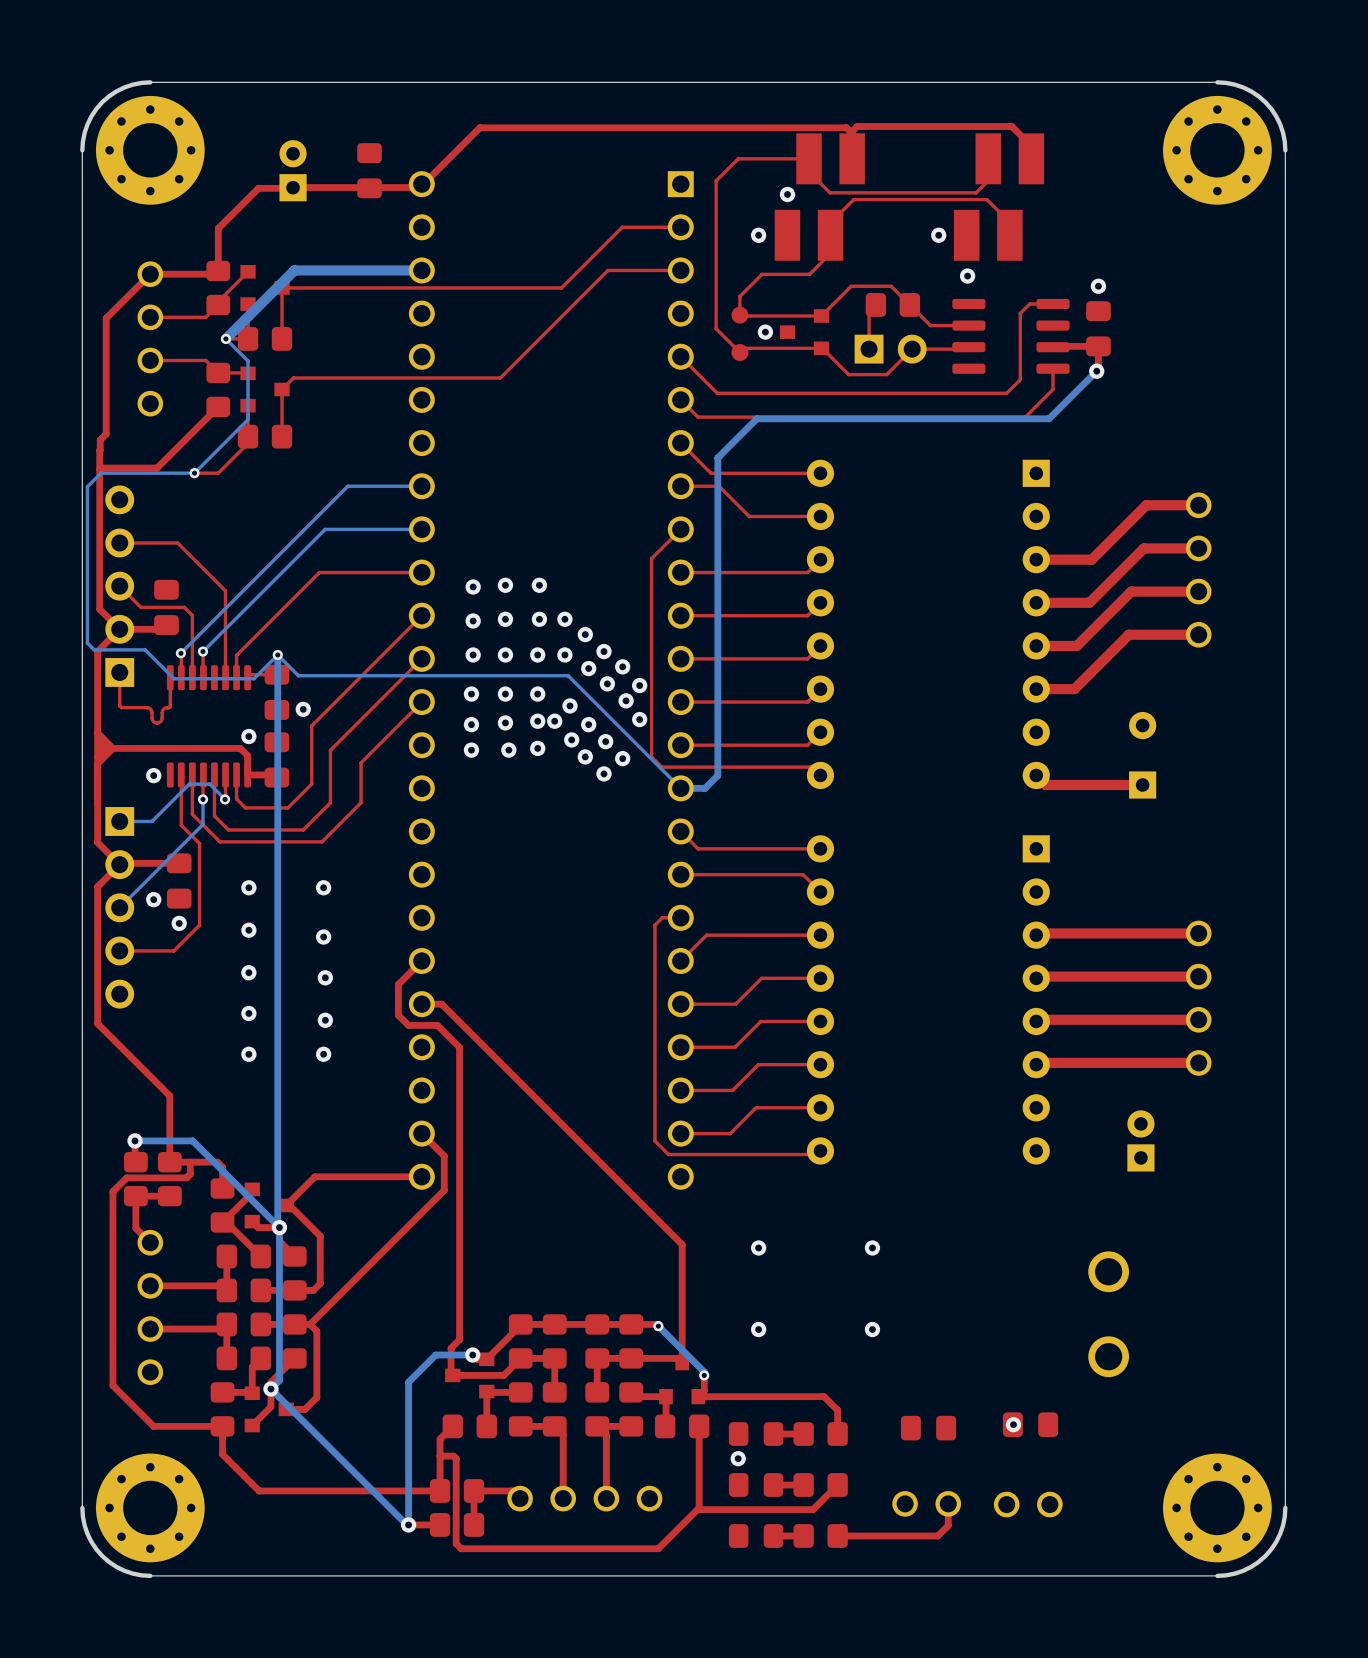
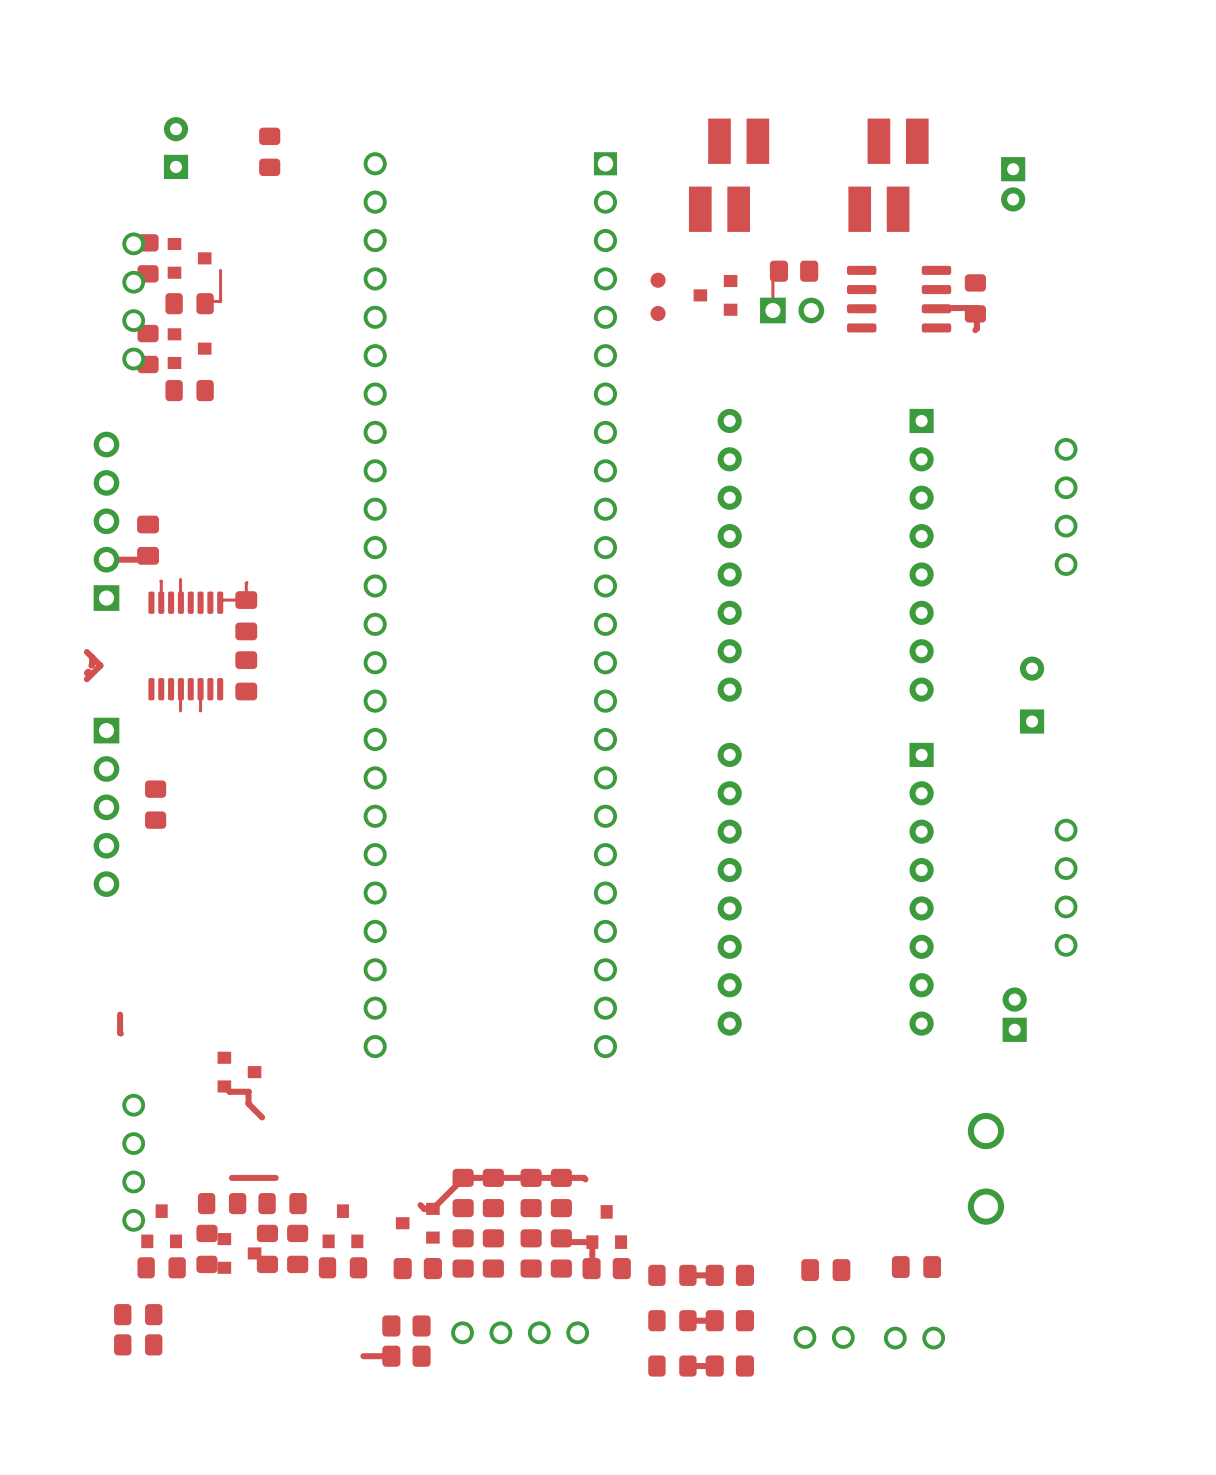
board edge: (1217, 82) (150, 82) (124, 87) (108, 96) (96, 108) (87, 124) (82, 150) (82, 1507) (87, 1533) (96, 1549) (108, 1561) (132, 1573) (150, 1575) (1217, 1575) (1243, 1570) (1258, 1561) (1271, 1549) (1283, 1525) (1285, 1507) (1285, 150) (1280, 124) (1265, 102) (1243, 87) (1217, 82) -> none
top track: (852, 133) (846, 127) (479, 127) (420, 187) (258, 188) (218, 228) (218, 270) (215, 274) (150, 274) (106, 318) (106, 434) (100, 440) (99, 450) (99, 609) (119, 629) (97, 651) (97, 842) (119, 864) -> none
part footprint: [279, 140, 307, 202] -> [259, 127, 281, 177]
part: (150, 150) -> none
part: (1217, 150) -> none
top track: (988, 158) (988, 180) (976, 192) (829, 192) (809, 171) (809, 158) (738, 158) (716, 180) (716, 328) (739, 352) (744, 348) (822, 348) (848, 374) (886, 374) (912, 349) (966, 349) (968, 347) -> none
top track: (1031, 158) (1031, 146) (1011, 126) (857, 126) (852, 131) (852, 158) -> none
part: none -> (176, 148)
part: (369, 170) -> none
via: (787, 194) -> none
part: none -> (1013, 184)
top track: (680, 227) (622, 227) (561, 287) (282, 287) (282, 338) -> none
via: (758, 235) -> none
via: (938, 235) -> none
top track: (1009, 235) (1009, 222) (986, 199) (853, 199) (830, 222) (830, 253) (809, 274) (762, 274) (739, 296) (740, 315) (821, 315) (851, 286) (891, 286) (930, 325) (968, 325) -> none
part footprint: [206, 260, 231, 316] -> [167, 237, 212, 279]
bottom track: (421, 270) (294, 270) (225, 338) (248, 361) (248, 419) (194, 473) (101, 473) (87, 486) (87, 643) (94, 649) (145, 649) (174, 678) (253, 678) (277, 654) -> none
top track: (680, 270) (607, 270) (500, 378) (293, 378) (282, 389) (282, 436) -> none
top track: (248, 271) (218, 301) (218, 304) (205, 317) (150, 317) -> none
via: (967, 276) -> none
via: (1098, 286) -> none
part: (265, 287) -> none
part: none -> (148, 258)
part footprint: [1086, 301, 1111, 357] -> [964, 274, 986, 323]
top track: (1053, 304) (1029, 304) (1020, 313) (1020, 379) (1006, 393) (717, 393) (680, 356) -> none
via: (765, 332) -> none
via: (225, 338) -> none
part: (265, 338) -> none
part: none -> (189, 303)
top track: (150, 360) (205, 360) (218, 372) (248, 373) -> none
part footprint: [206, 362, 231, 418] -> [167, 328, 212, 370]
top track: (1053, 368) (1053, 389) (1025, 417) (697, 417) (680, 399) -> none
bottom track: (1096, 371) (1049, 418) (756, 418) (717, 457) (717, 775) (705, 788) (680, 788) (568, 675) (298, 675) (277, 654) -> none
via: (1096, 371) -> none
part: (265, 389) -> none
part: none -> (148, 349)
top track: (248, 405) (248, 443) (218, 473) (194, 473) (196, 471) -> none
top track: (218, 406) (157, 468) (99, 469) -> none
part: (265, 436) -> none
part: none -> (189, 390)
top track: (680, 443) (711, 473) (820, 473) -> none
via: (194, 473) -> none
bottom track: (421, 486) (347, 486) (180, 653) -> none
top track: (680, 486) (719, 486) (749, 516) (820, 516) -> none
top track: (1198, 505) (1146, 505) (1091, 559) (1036, 559) -> none
bottom track: (421, 529) (325, 529) (202, 651) -> none
top track: (680, 529) (651, 558) (651, 756) (661, 767) (812, 767) (820, 775) -> none
top track: (119, 542) (177, 542) (225, 590) (225, 677) -> none
top track: (1198, 548) (1143, 548) (1089, 602) (1036, 602) -> none
top track: (820, 559) (807, 572) (680, 572) -> none
top track: (421, 572) (319, 572) (236, 655) (236, 677) -> none
via: (505, 585) -> none
via: (539, 585) -> none
top track: (119, 586) (140, 607) (184, 607) (192, 615) (192, 677) -> none
via: (473, 587) -> none
top track: (1198, 591) (1131, 591) (1076, 645) (1036, 645) -> none
top track: (820, 602) (807, 615) (680, 615) -> none
top track: (421, 615) (311, 725) (311, 784) (287, 807) (245, 807) (236, 798) (236, 774) -> none
via: (505, 619) -> none
via: (539, 619) -> none
via: (564, 619) -> none
via: (473, 620) -> none
via: (585, 634) -> none
top track: (1198, 634) (1128, 634) (1074, 689) (1036, 689) -> none
top track: (820, 645) (807, 658) (680, 658) -> none
via: (202, 651) -> none
via: (603, 651) -> none
via: (180, 653) -> none
bottom track: (277, 654) (277, 1225) -> none
via: (277, 654) -> none
via: (473, 654) -> none
via: (505, 654) -> none
via: (537, 654) -> none
via: (564, 654) -> none
top track: (421, 658) (330, 750) (330, 802) (303, 829) (228, 829) (214, 815) (214, 774) -> none
via: (622, 666) -> none
via: (588, 668) -> none
top track: (119, 672) (119, 705) (121, 707) (148, 708) (151, 711) (152, 720) (156, 722) (161, 720) (163, 709) (170, 706) (170, 677) -> none
via: (607, 683) -> none
via: (639, 685) -> none
top track: (820, 689) (807, 702) (680, 702) -> none
via: (471, 694) -> none
via: (505, 694) -> none
via: (537, 694) -> none
via: (626, 700) -> none
top track: (421, 702) (361, 762) (361, 802) (321, 841) (219, 841) (192, 814) (192, 774) -> none
via: (570, 705) -> none
via: (303, 709) -> none
via: (639, 719) -> none
via: (537, 721) -> none
via: (554, 721) -> none
via: (505, 722) -> none
via: (471, 724) -> none
via: (588, 724) -> none
top track: (820, 732) (807, 745) (680, 745) -> none
via: (248, 736) -> none
via: (571, 739) -> none
via: (605, 741) -> none
top track: (99, 745) (102, 748) (240, 748) (247, 755) (247, 774) (274, 774) (276, 777) -> none
via: (537, 748) -> none
via: (471, 750) -> none
via: (508, 750) -> none
part position: (1142, 755) -> (1032, 695)
via: (585, 756) -> none
via: (622, 758) -> none
via: (603, 773) -> none
top track: (181, 774) (181, 825) (199, 843) (199, 925) (173, 950) (119, 950) -> none
via: (153, 775) -> none
top track: (1036, 775) (1045, 785) (1142, 785) -> none
bottom track: (202, 799) (202, 824) (119, 907) -> none
via: (202, 799) -> none
bottom track: (225, 799) (209, 784) (189, 784) (152, 821) (119, 821) -> none
via: (225, 799) -> none
top track: (680, 831) (698, 848) (820, 848) -> none
top track: (179, 863) (121, 863) (97, 886) (97, 1023) (169, 1095) (169, 1162) (217, 1162) (222, 1167) (222, 1188) -> none
top track: (680, 874) (803, 874) (820, 892) -> none
part: (179, 880) -> none
via: (248, 887) -> none
via: (323, 887) -> none
via: (153, 899) -> none
part: none -> (155, 804)
top track: (680, 917) (662, 917) (654, 925) (654, 1140) (668, 1154) (816, 1154) (820, 1150) -> none
via: (179, 923) -> none
via: (248, 930) -> none
top track: (1198, 933) (1037, 933) (1036, 935) -> none
top track: (820, 935) (706, 935) (680, 960) -> none
via: (323, 937) -> none
top track: (421, 960) (398, 984) (398, 1015) (408, 1025) (437, 1025) (459, 1047) (459, 1339) (451, 1348) (451, 1373) (452, 1375) (503, 1375) (520, 1358) (554, 1358) (554, 1392) -> none
via: (248, 972) -> none
top track: (1198, 976) (1037, 976) (1036, 978) -> none
via: (325, 977) -> none
top track: (820, 978) (761, 978) (735, 1004) (680, 1004) -> none
top track: (421, 1004) (441, 1004) (682, 1244) (682, 1362) (677, 1358) (597, 1358) (597, 1392) -> none
via: (248, 1013) -> none
top track: (1198, 1019) (1037, 1019) (1036, 1021) -> none
via: (325, 1020) -> none
top track: (820, 1021) (760, 1021) (735, 1047) (680, 1047) -> none
via: (248, 1054) -> none
via: (323, 1054) -> none
top track: (1198, 1062) (1037, 1062) (1036, 1064) -> none
top track: (820, 1064) (758, 1064) (732, 1090) (680, 1090) -> none
top track: (820, 1107) (756, 1107) (730, 1133) (680, 1133) -> none
top track: (421, 1133) (444, 1156) (444, 1190) (310, 1324) (316, 1331) (316, 1397) (304, 1409) (286, 1409) -> none
bottom track: (135, 1140) (192, 1140) (279, 1227) (279, 1380) (270, 1389) (406, 1524) (408, 1524) (408, 1382) (435, 1355) (472, 1355) -> none
via: (135, 1140) -> none
top track: (190, 1162) (190, 1174) (186, 1177) (126, 1177) (112, 1191) (112, 1385) (153, 1426) (222, 1426) (222, 1454) (259, 1490) (440, 1490) (440, 1439) (452, 1426) -> none
top track: (421, 1176) (314, 1176) (286, 1205) (289, 1205) (320, 1236) (320, 1283) (313, 1290) (260, 1290) -> none
part: (135, 1179) -> none
part: (169, 1179) -> none
top track: (252, 1189) (252, 1192) (222, 1222) (226, 1222) (260, 1256) -> none
top track: (169, 1196) (135, 1196) (135, 1228) (150, 1242) -> none
part: (222, 1205) -> none
via: (279, 1227) -> none
via: (758, 1247) -> none
via: (872, 1247) -> none
top track: (226, 1256) (226, 1290) (222, 1285) (150, 1285) -> none
part: (243, 1256) -> none
part: (294, 1273) -> none
part: (243, 1290) -> none
part: (243, 1324) -> none
bottom track: (658, 1326) (704, 1372) (704, 1375) -> none
via: (658, 1326) -> none
top track: (150, 1329) (222, 1329) (226, 1324) (226, 1358) -> none
via: (758, 1329) -> none
via: (872, 1329) -> none
part: (294, 1341) -> none
part footprint: [216, 1346, 271, 1371] -> [197, 1193, 247, 1215]
part: none -> (282, 1203)
via: (472, 1355) -> none
top track: (260, 1358) (252, 1366) (252, 1393) (222, 1392) -> none
top track: (294, 1358) (270, 1382) (270, 1406) (252, 1425) -> none
top track: (704, 1375) (704, 1390) (698, 1396) (824, 1396) (837, 1410) (837, 1434) -> none
via: (704, 1375) -> none
part: none -> (161, 1226)
part: none -> (342, 1226)
part footprint: [210, 1382, 235, 1437] -> [196, 1224, 218, 1274]
via: (270, 1389) -> none
top track: (520, 1392) (486, 1391) (486, 1426) -> none
part: none -> (267, 1248)
part: none -> (297, 1248)
via: (1013, 1424) -> none
part: none -> (161, 1267)
part: none -> (342, 1267)
top track: (520, 1426) (554, 1426) (563, 1434) (563, 1498) -> none
top track: (631, 1426) (597, 1426) (606, 1435) (606, 1498) -> none
top track: (699, 1426) (699, 1507) -> none
part footprint: [95, 1453, 205, 1563] -> [114, 1334, 163, 1356]
top track: (440, 1456) (453, 1456) (456, 1458) (456, 1543) (461, 1548) (658, 1548) (699, 1507) -> none
via: (738, 1458) -> none
part: none -> (138, 1314)
top track: (837, 1485) (812, 1509) (700, 1509) (699, 1507) -> none
top track: (520, 1498) (512, 1490) (474, 1490) (474, 1524) -> none
top track: (948, 1503) (948, 1525) (937, 1535) (837, 1535) -> none
part: (1217, 1507) -> none
via: (408, 1524) -> none

